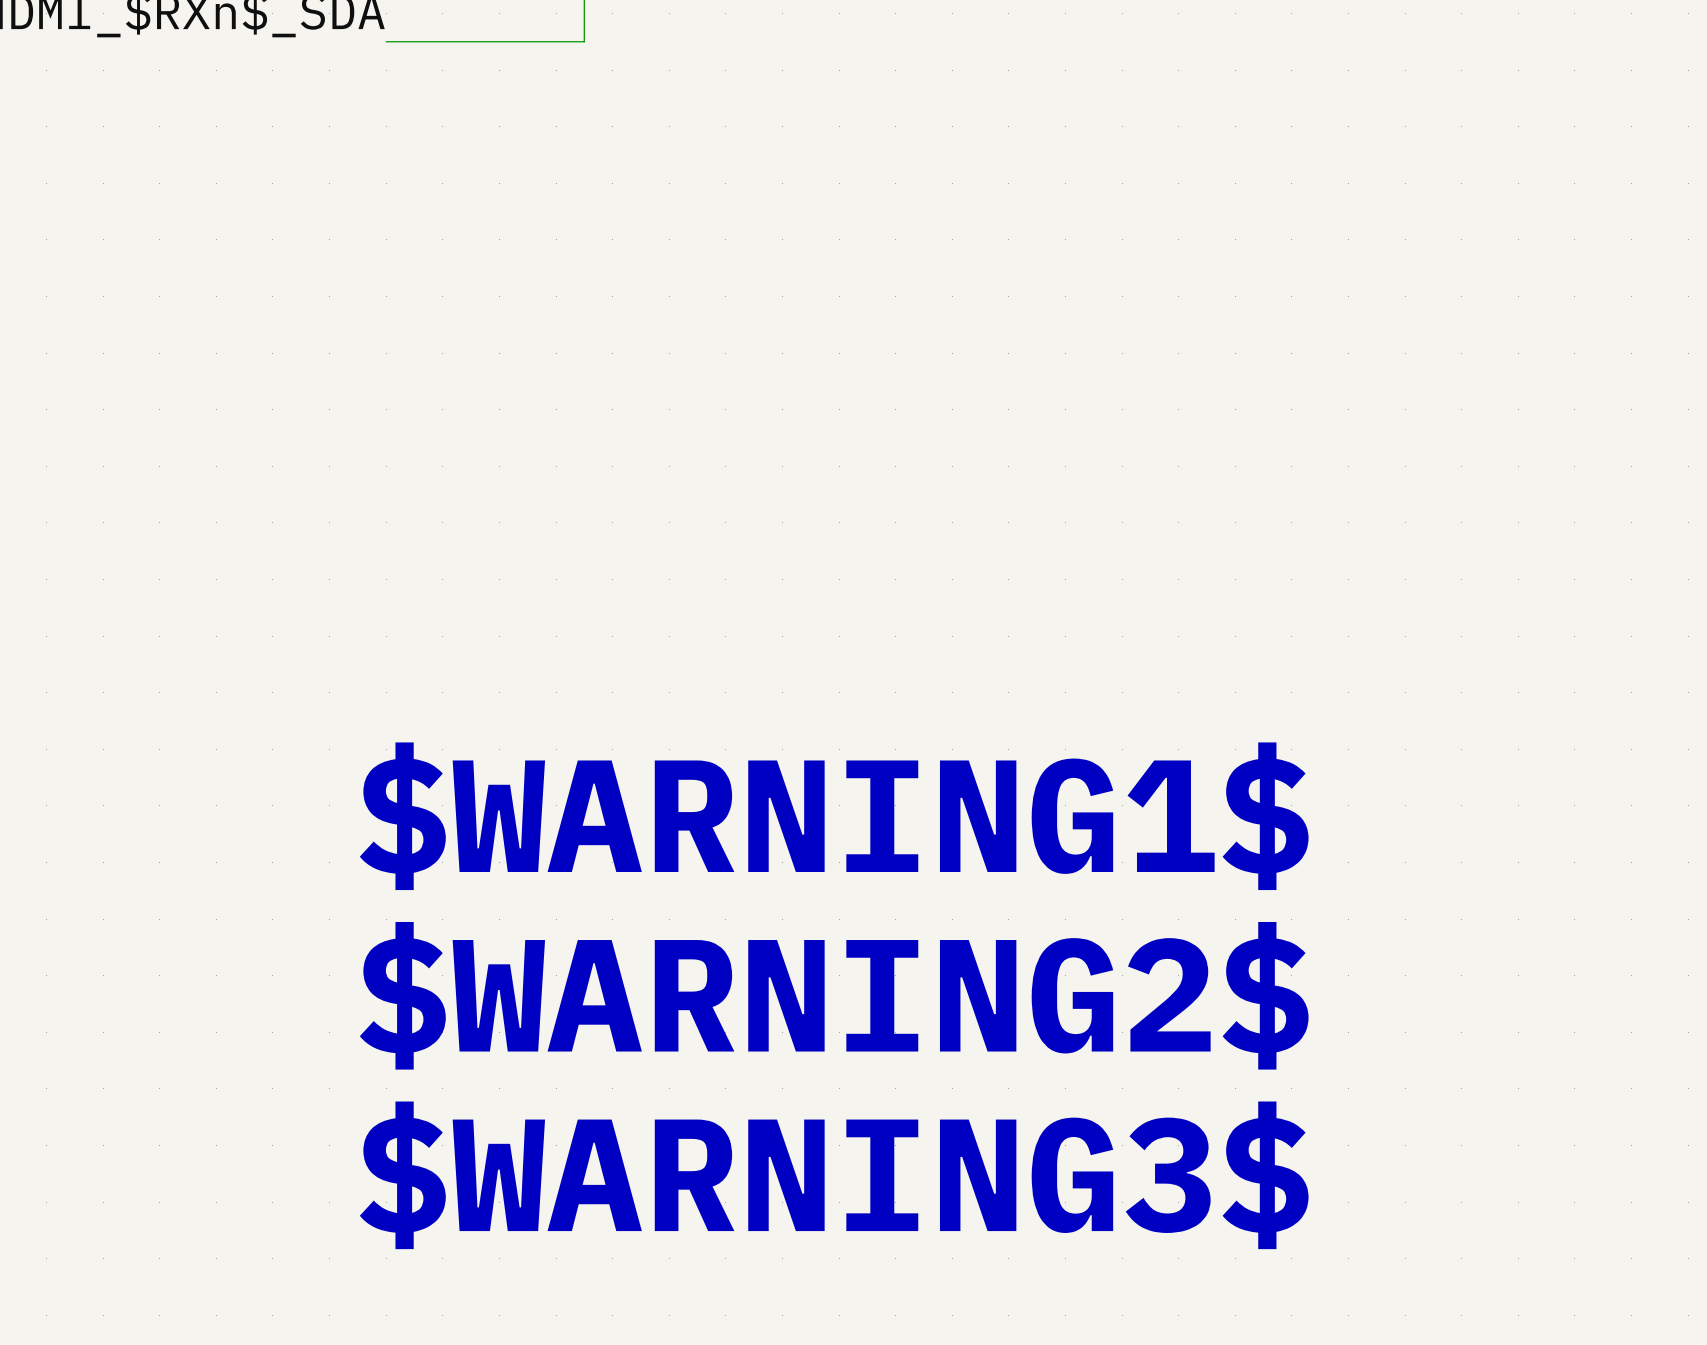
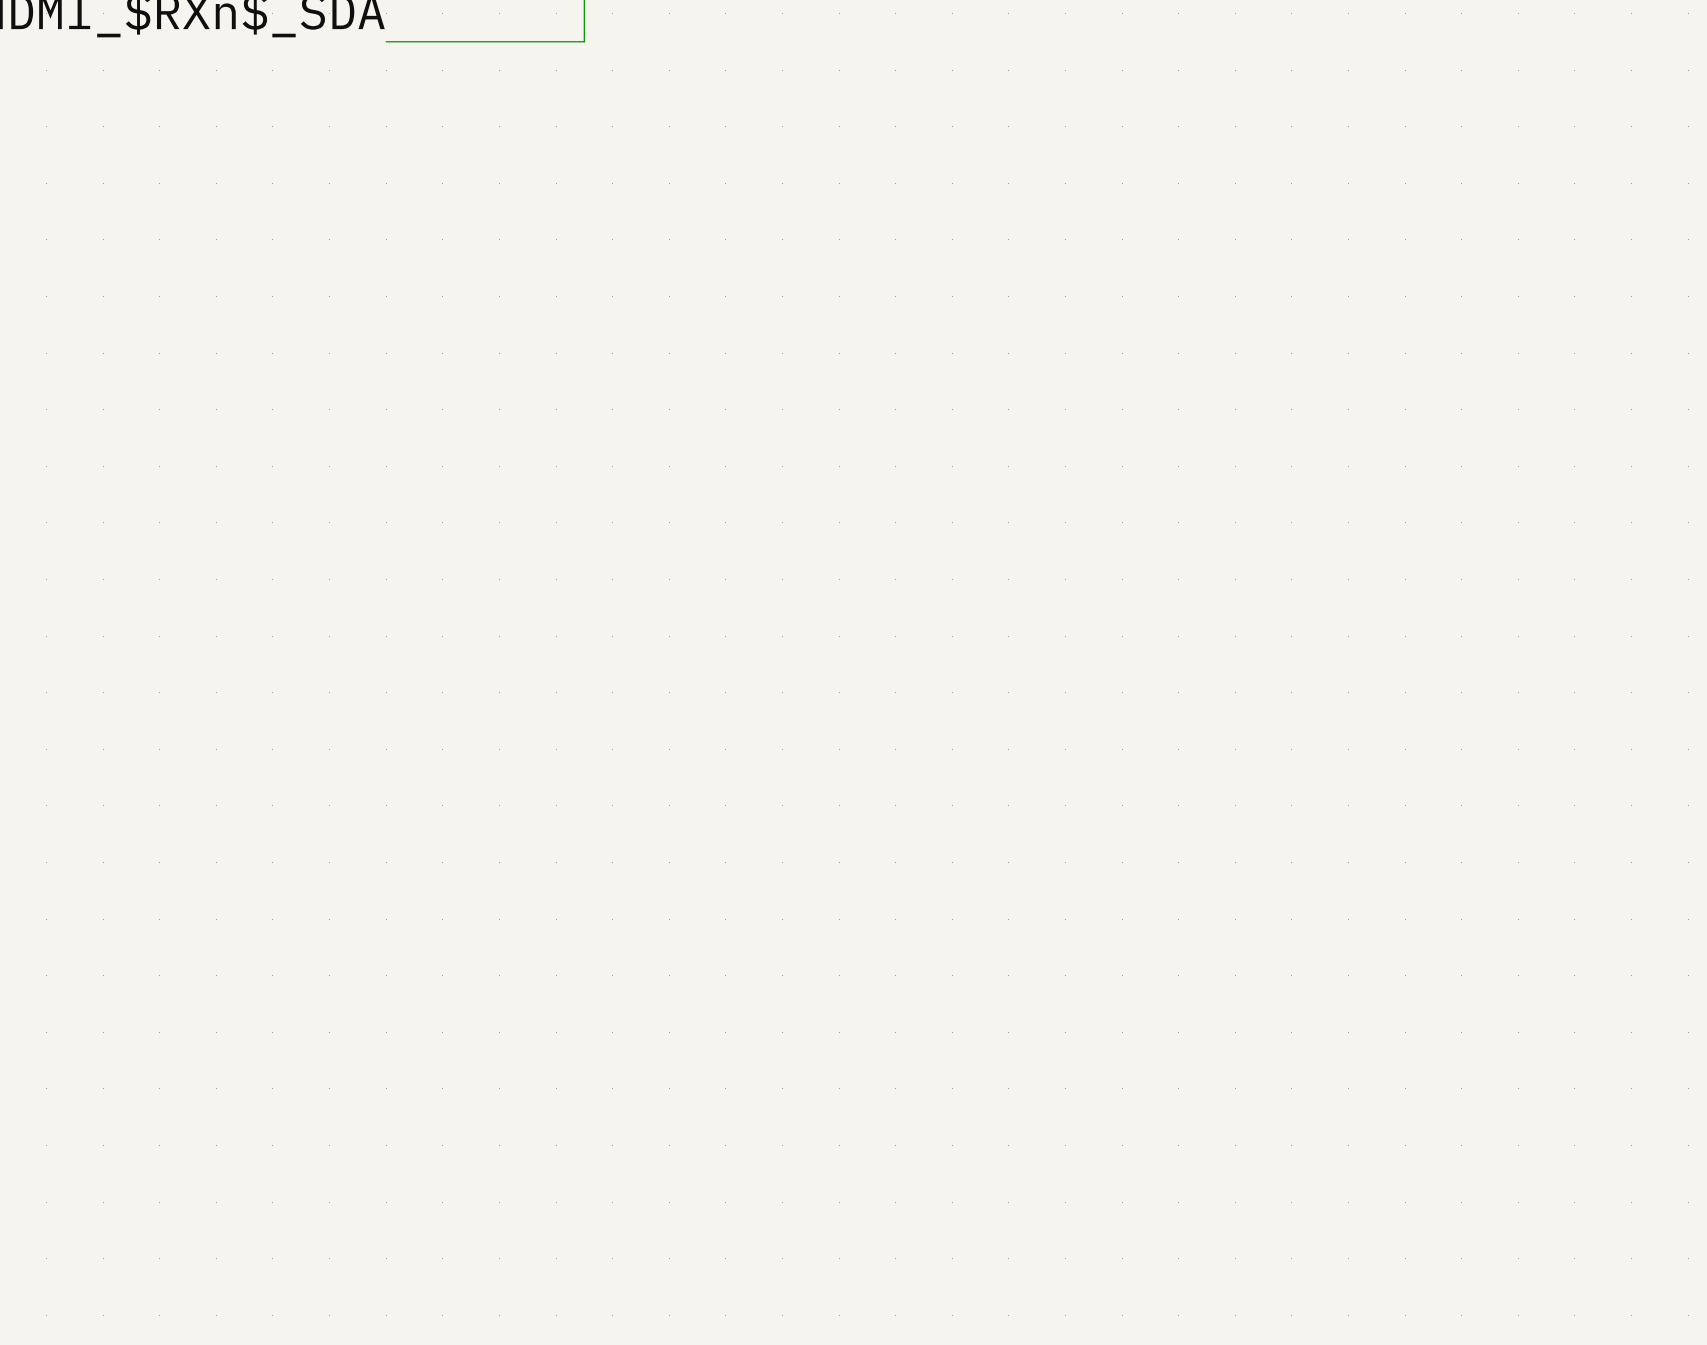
text: $WARNING1$ (834, 816) -> none
text: $WARNING2$ (834, 995) -> none
text: $WARNING3$ (834, 1175) -> none

